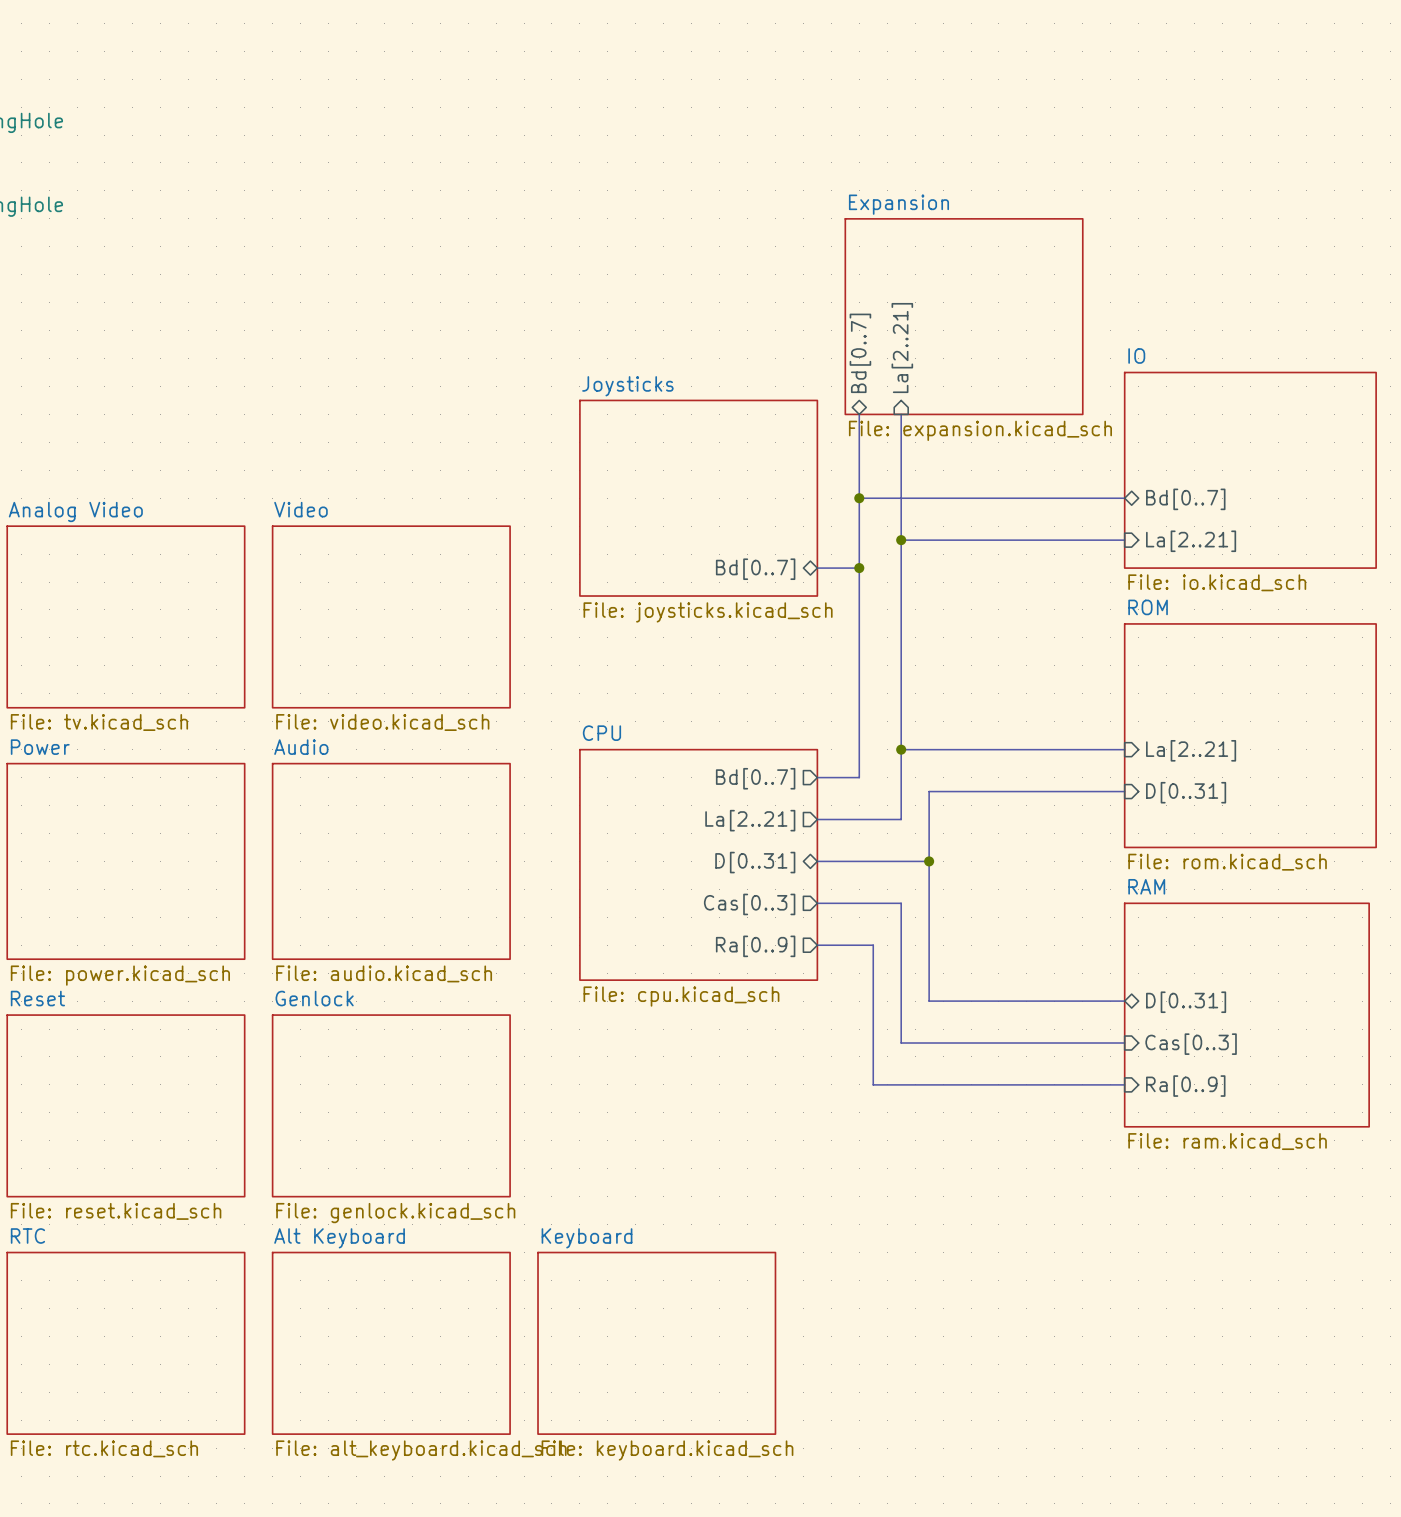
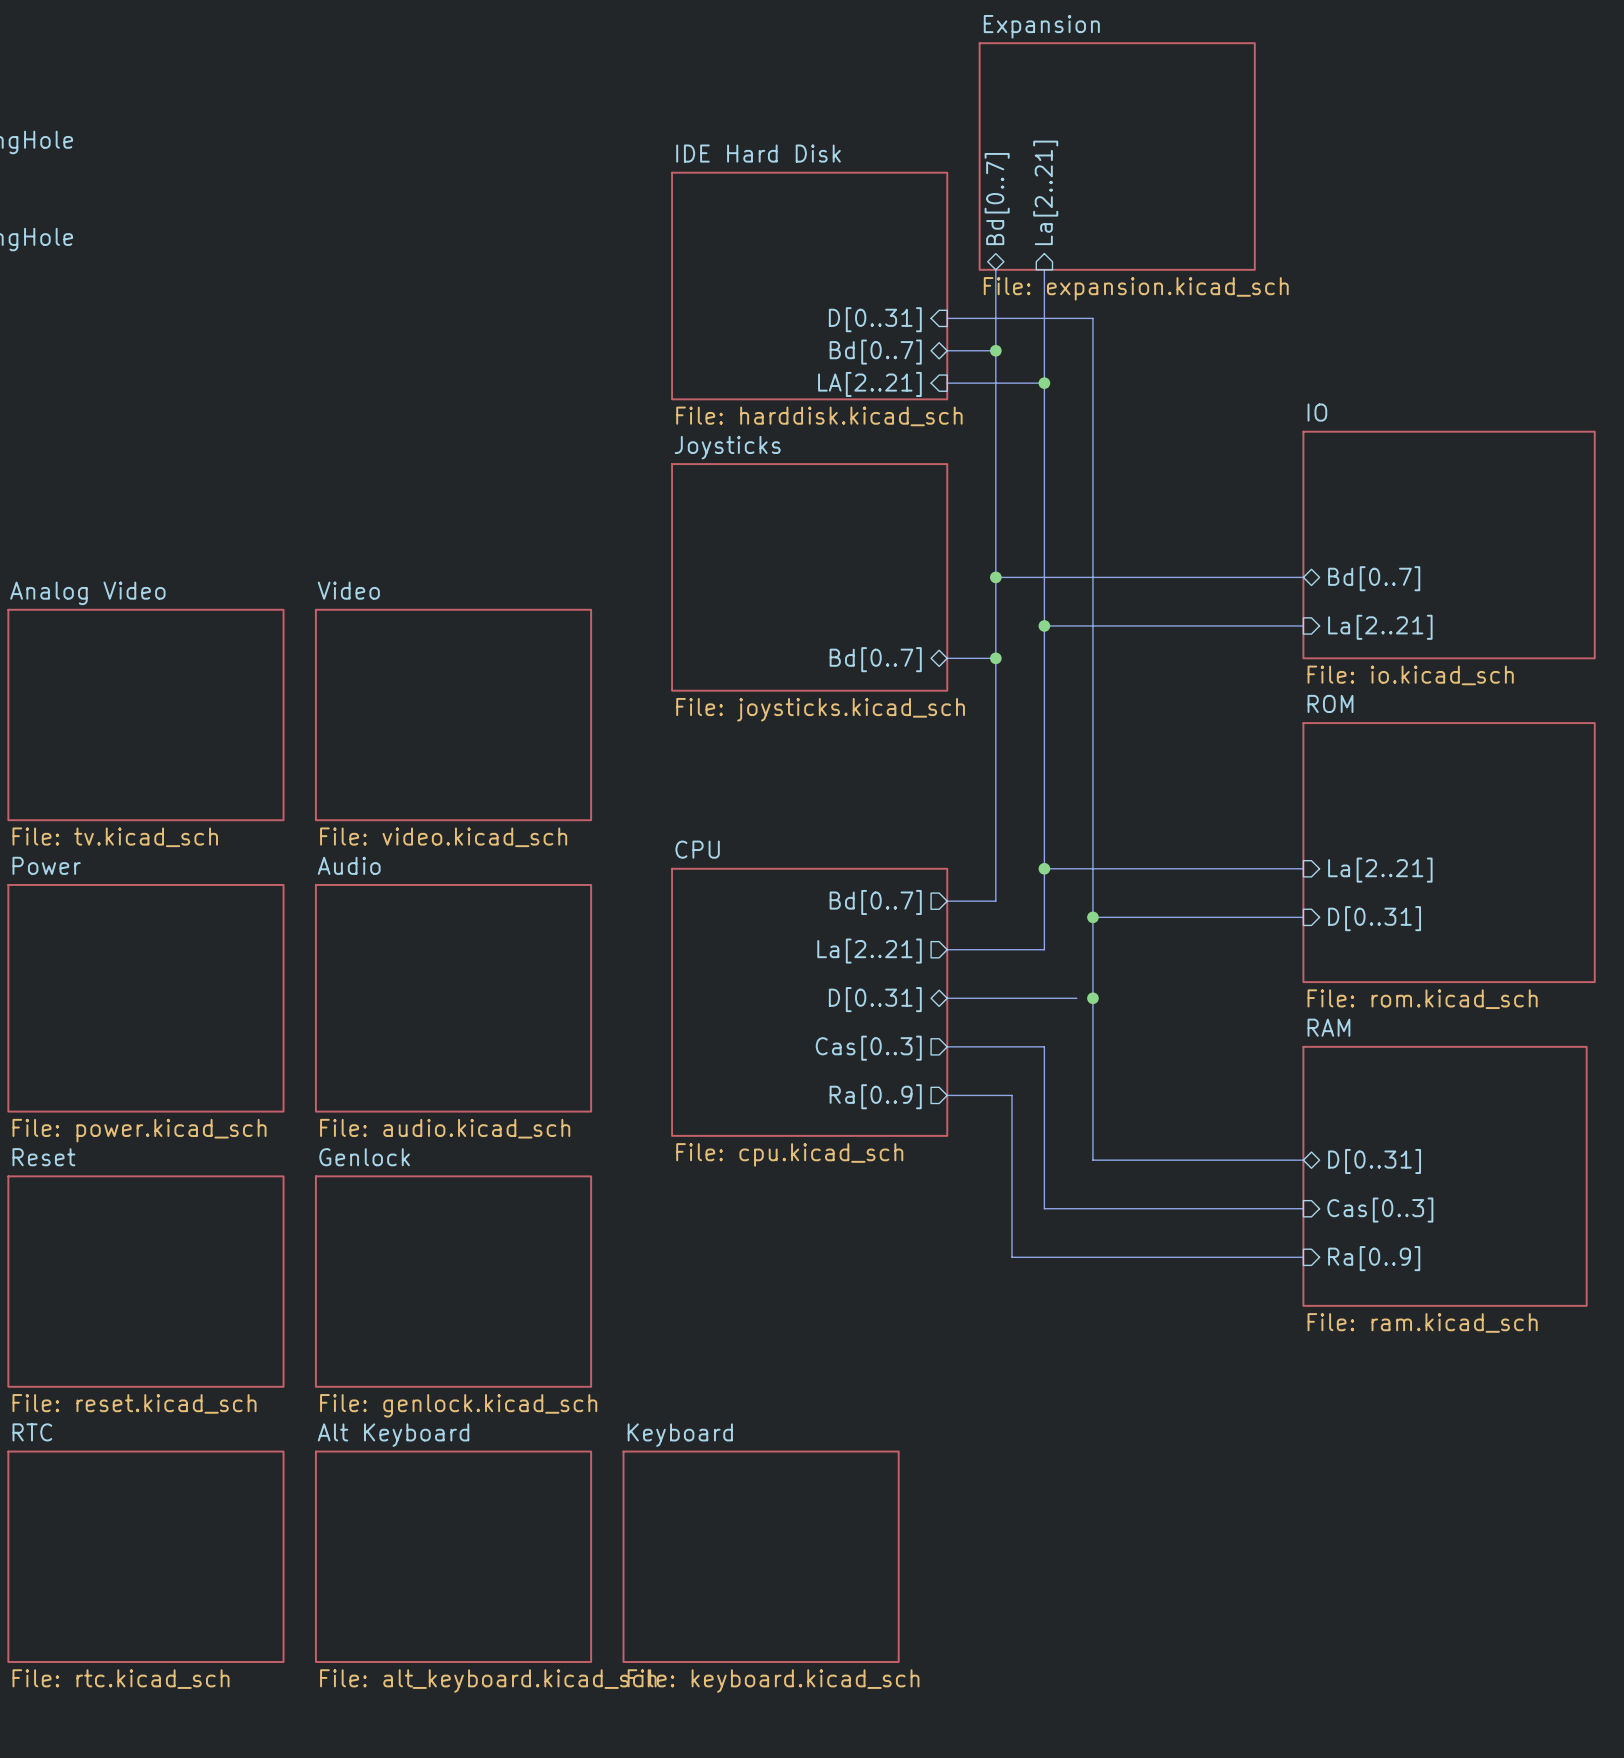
sheet pin: none -> Bd[0..7] (997, 199)
bus: none -> (995, 269) (995, 480)
bus: none -> (1044, 269) (1044, 480)
sheet IDE Hard Disk: none -> File: harddisk.kicad_sch (809, 286)
sheet pin: none -> D[0..31] (875, 319)
bus: none -> (947, 350) (995, 350)
junction: none -> (995, 350)
sheet pin: none -> Bd[0..7] (875, 352)
sheet Expansion position: (964, 316) -> (1117, 156)
bus: none -> (947, 383) (1044, 383)
junction: none -> (1044, 383)
sheet pin: none -> LA[2..21] (869, 384)
sheet pin position: La[2..21] (902, 348) -> La[2..21] (1045, 192)
sheet pin: Bd[0..7] (860, 353) -> none
bus: (943, 791) (929, 791) (929, 1001) (943, 1001) -> (947, 318) (1092, 318) (1092, 1160)
junction: none -> (1092, 917)
junction position: (929, 861) -> (1092, 998)

